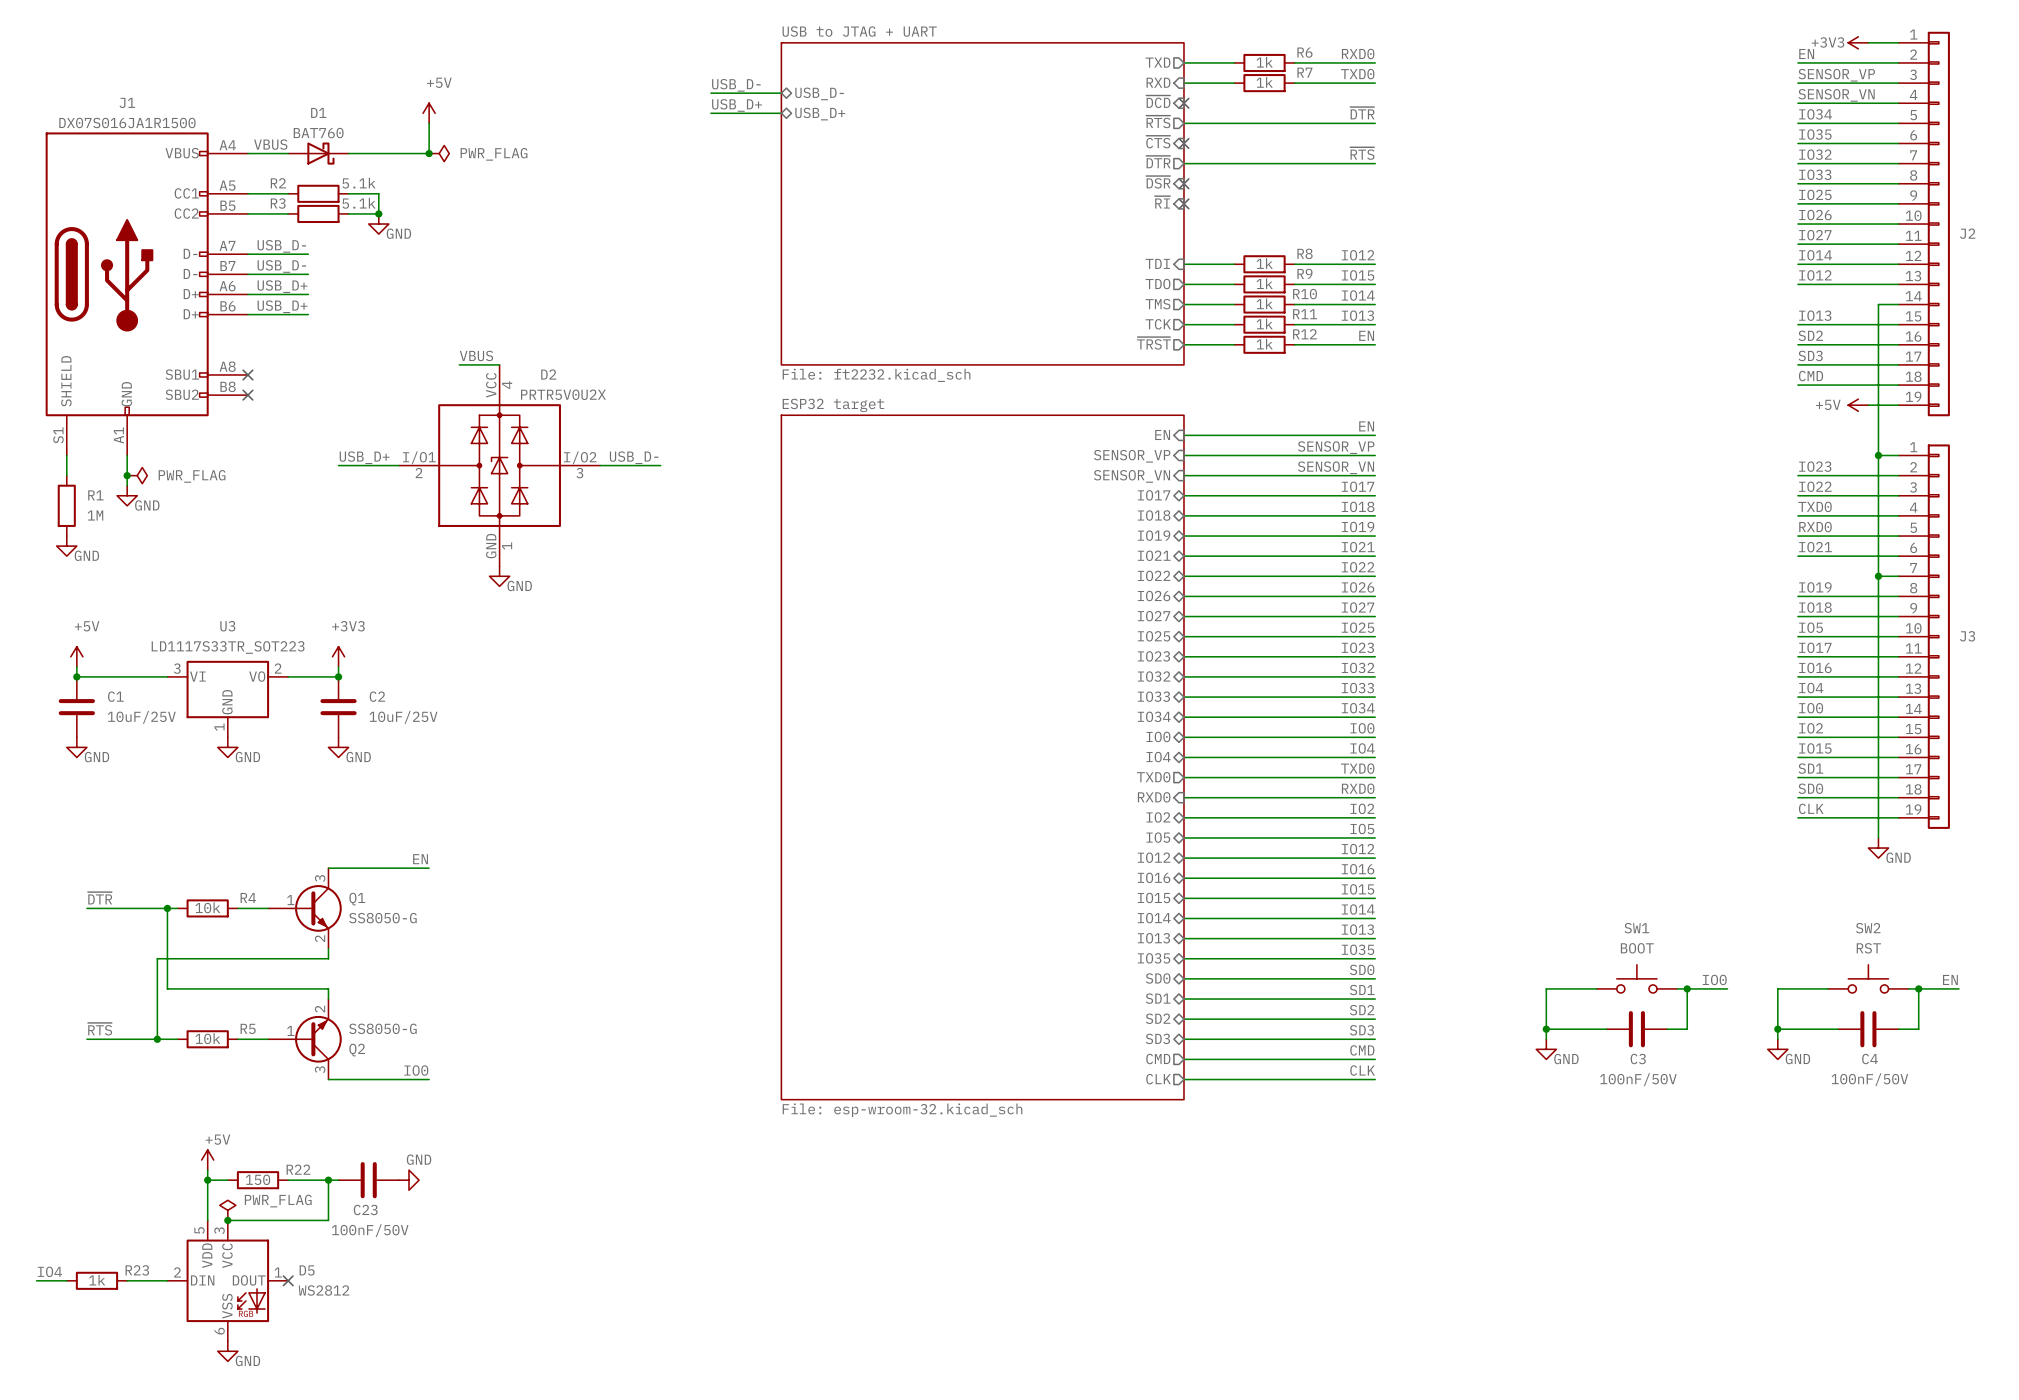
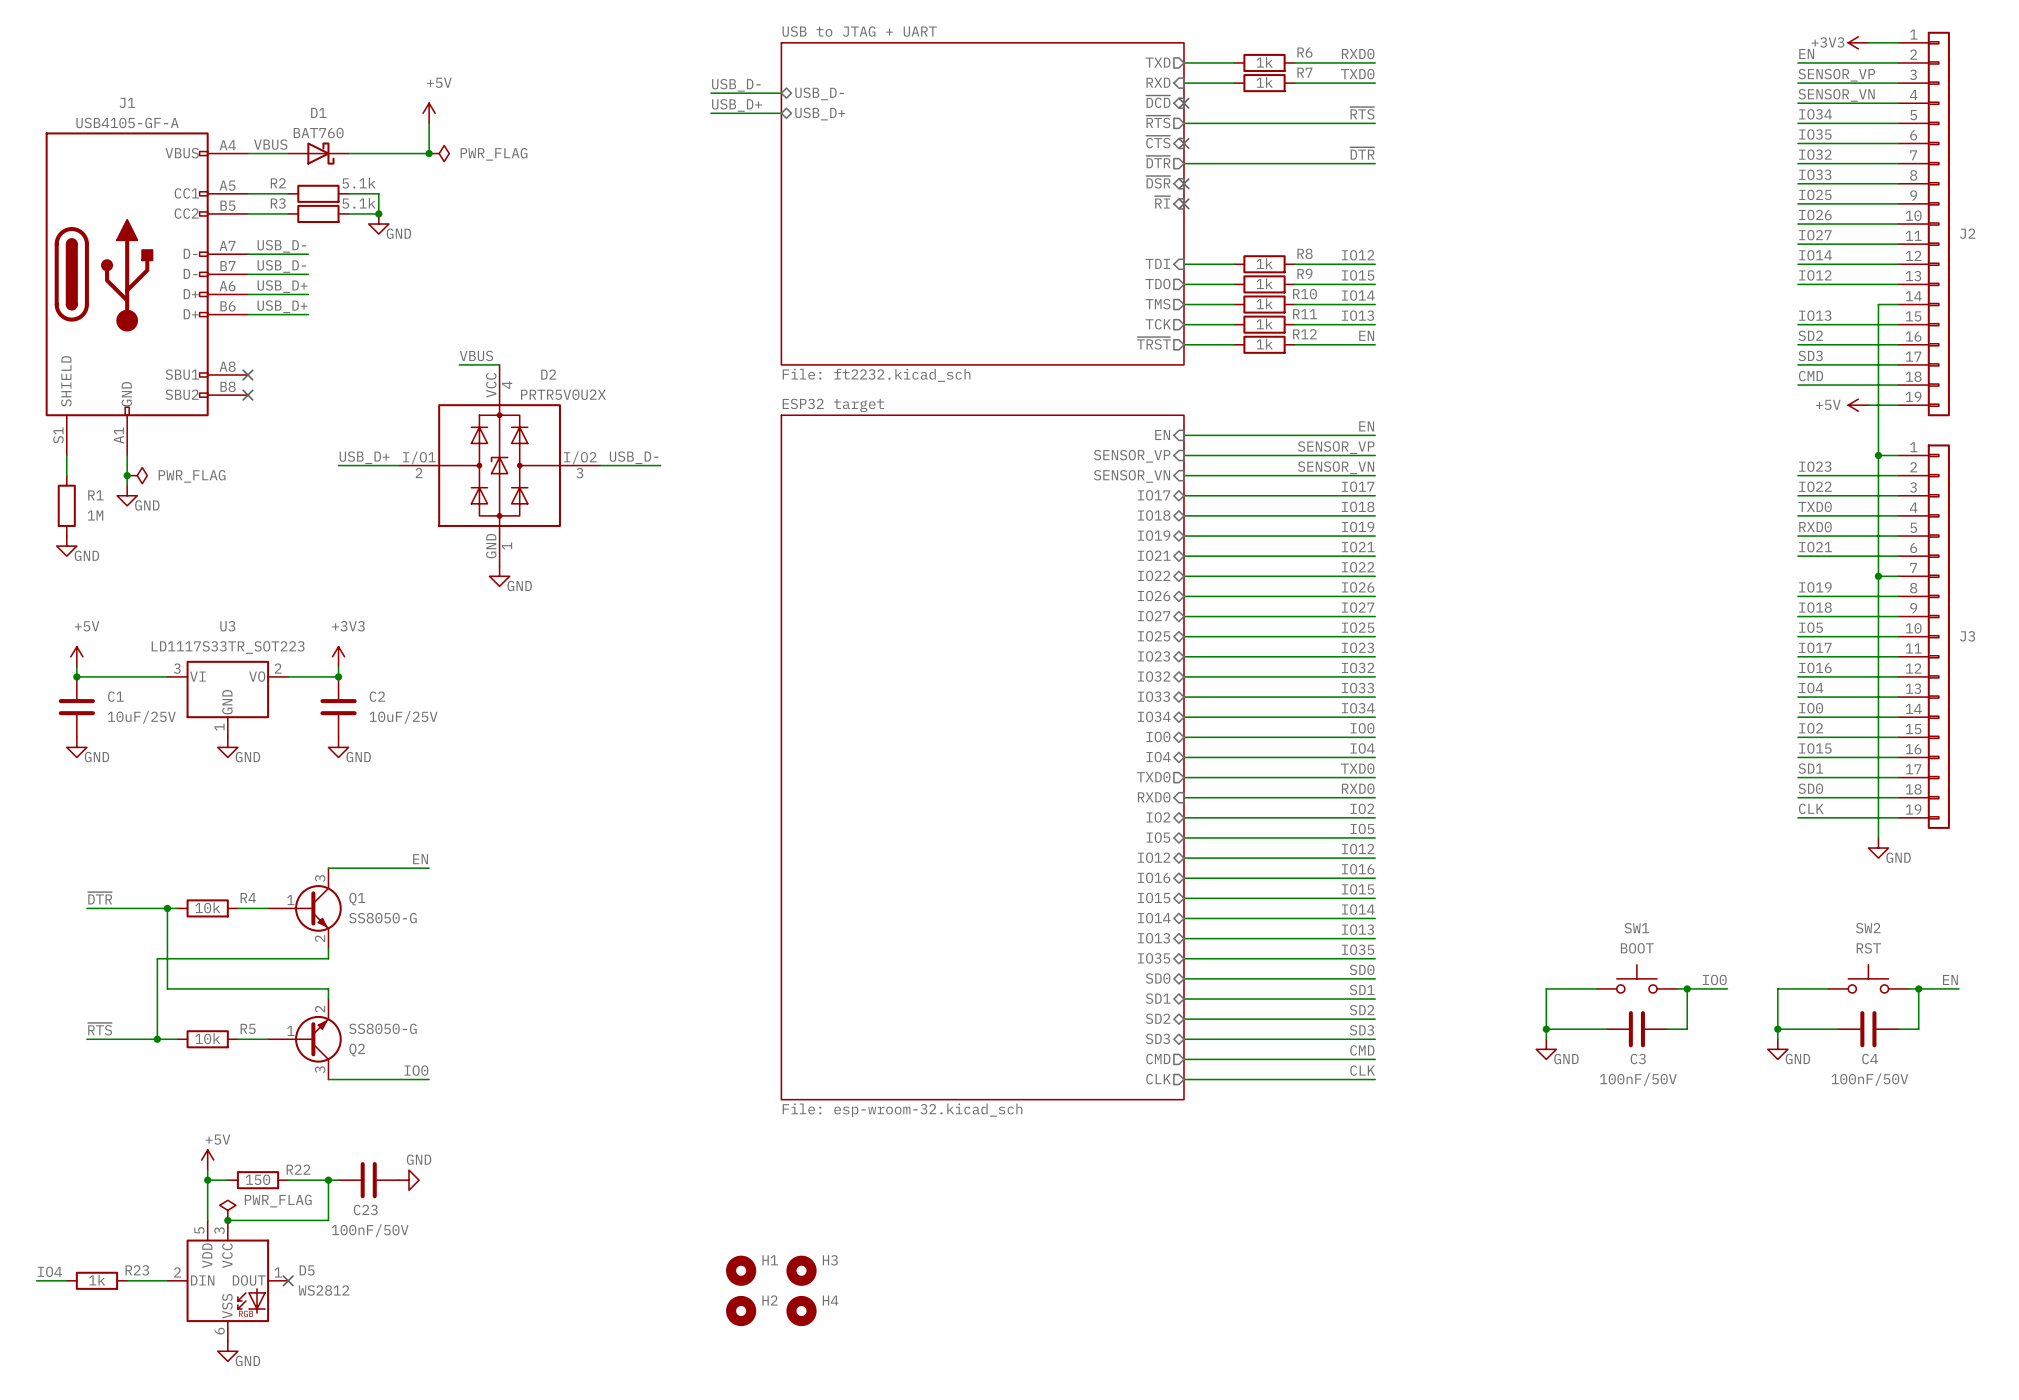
label: ~{DTR} (1362, 113) -> ~{RTS} (1362, 113)
J1 value: DX07S016JA1R1500 (127, 122) -> USB4105-GF-A (127, 122)
label: ~{RTS} (1362, 153) -> ~{DTR} (1362, 153)
H1: none -> (741, 1270)
H3: none -> (801, 1270)
H2: none -> (741, 1311)
H4: none -> (801, 1311)

